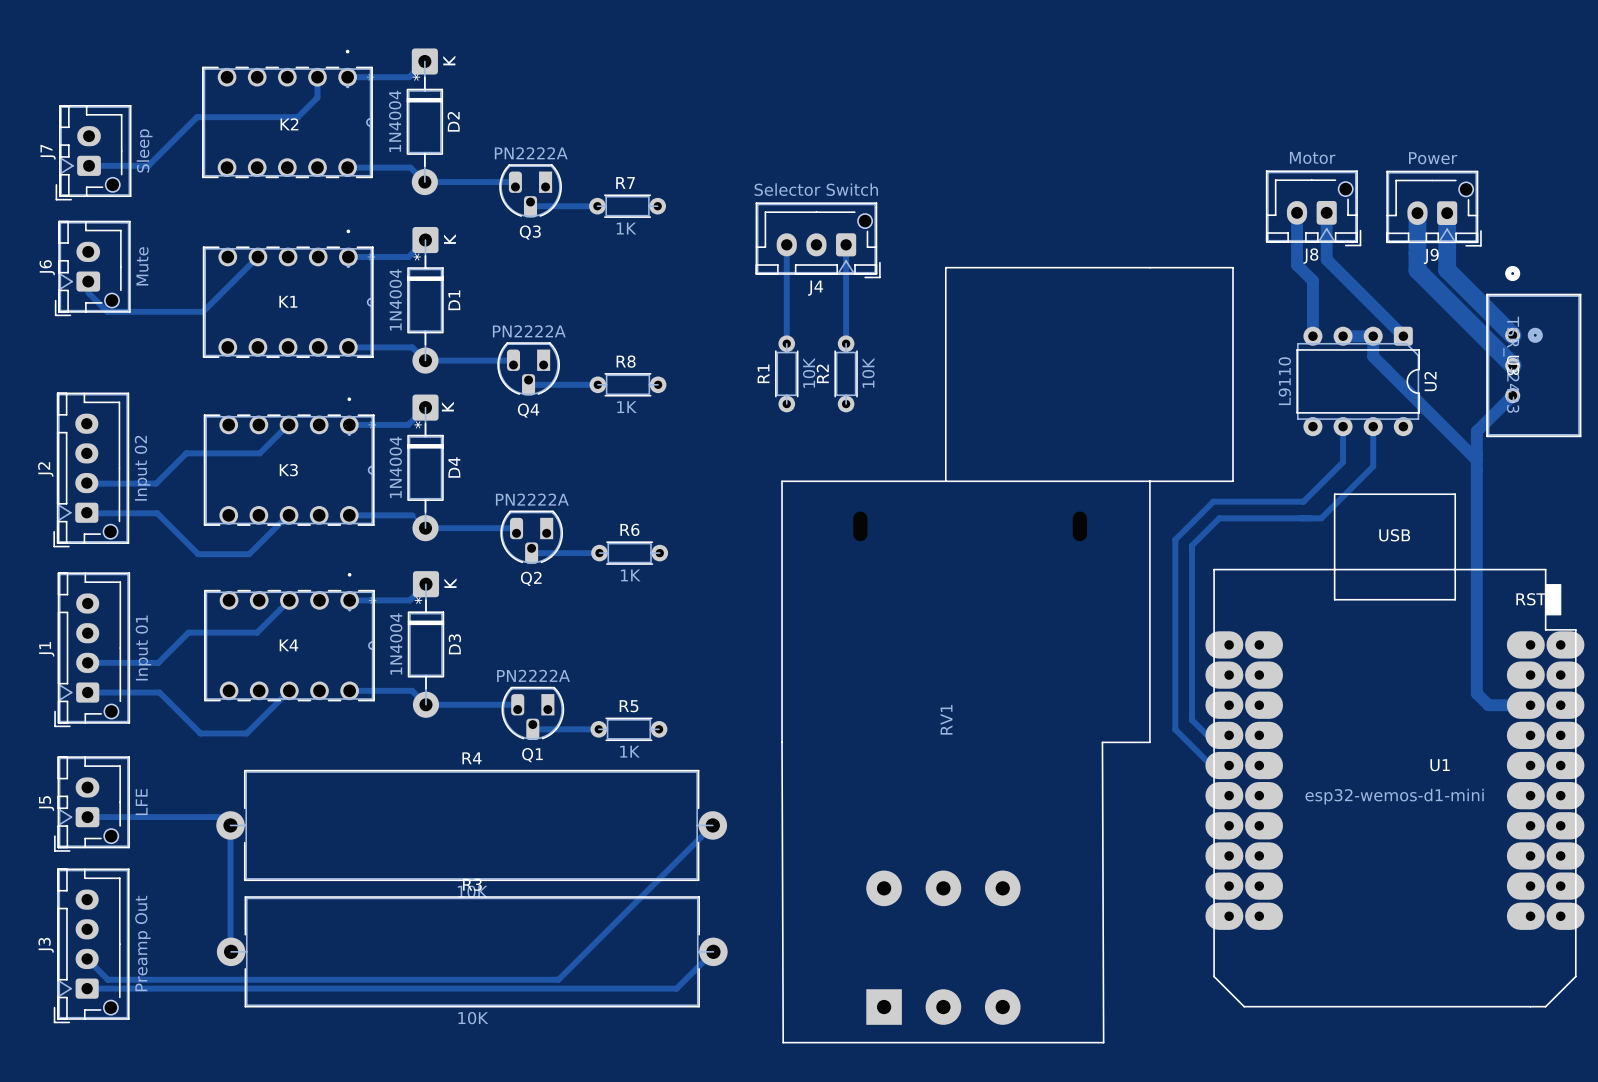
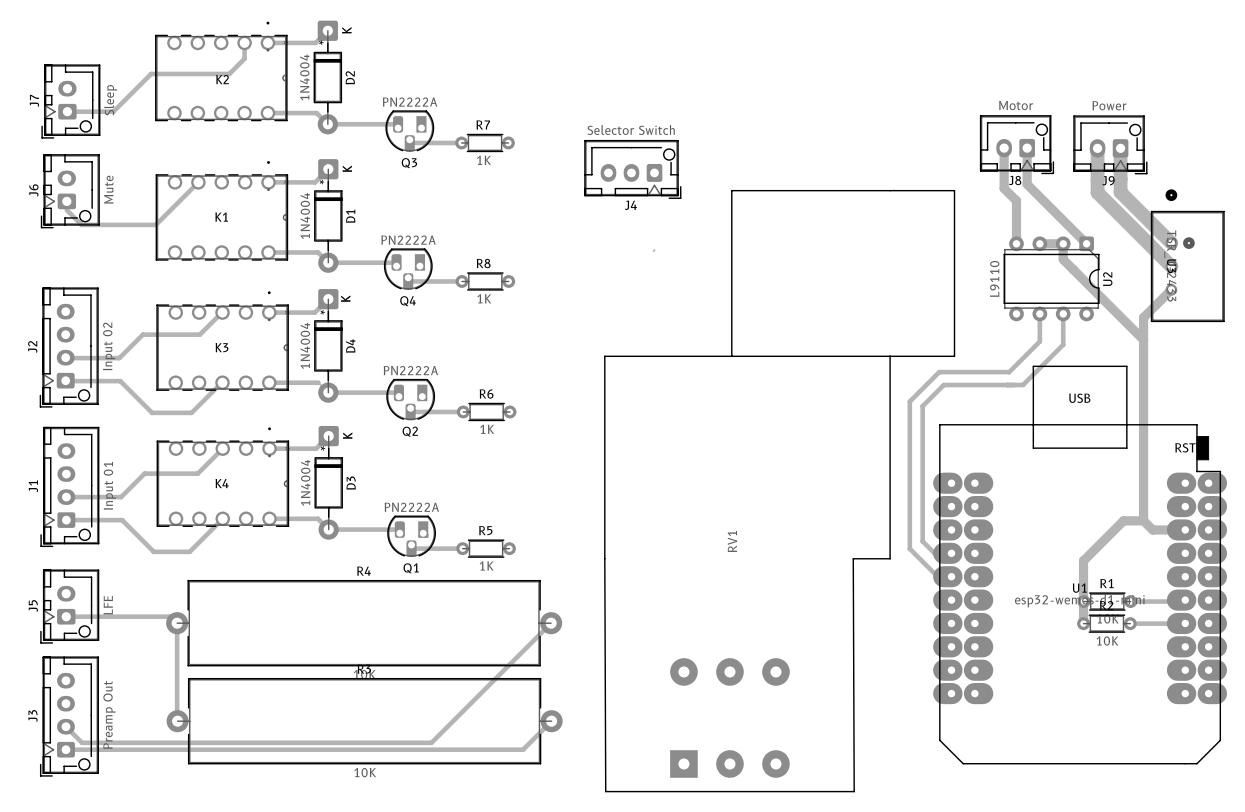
track: (786, 244) (786, 343) -> none
track: (846, 244) (846, 343) -> none
R1 rotation: 0° (786, 373) -> 90° clockwise (1107, 601)
R1 position: (786, 373) -> (1107, 601)
R2 rotation: 0° (846, 373) -> 90° clockwise (1106, 623)
R2 position: (846, 373) -> (1106, 623)
track: none -> (1143, 520) (1123, 520) (1083, 560) (1083, 623) (1083, 601)
U1 name position: U1 (1440, 765) -> U1 (1079, 588)
track: none -> (1185, 600) (1130, 601)
track: none -> (1185, 623) (1130, 623)

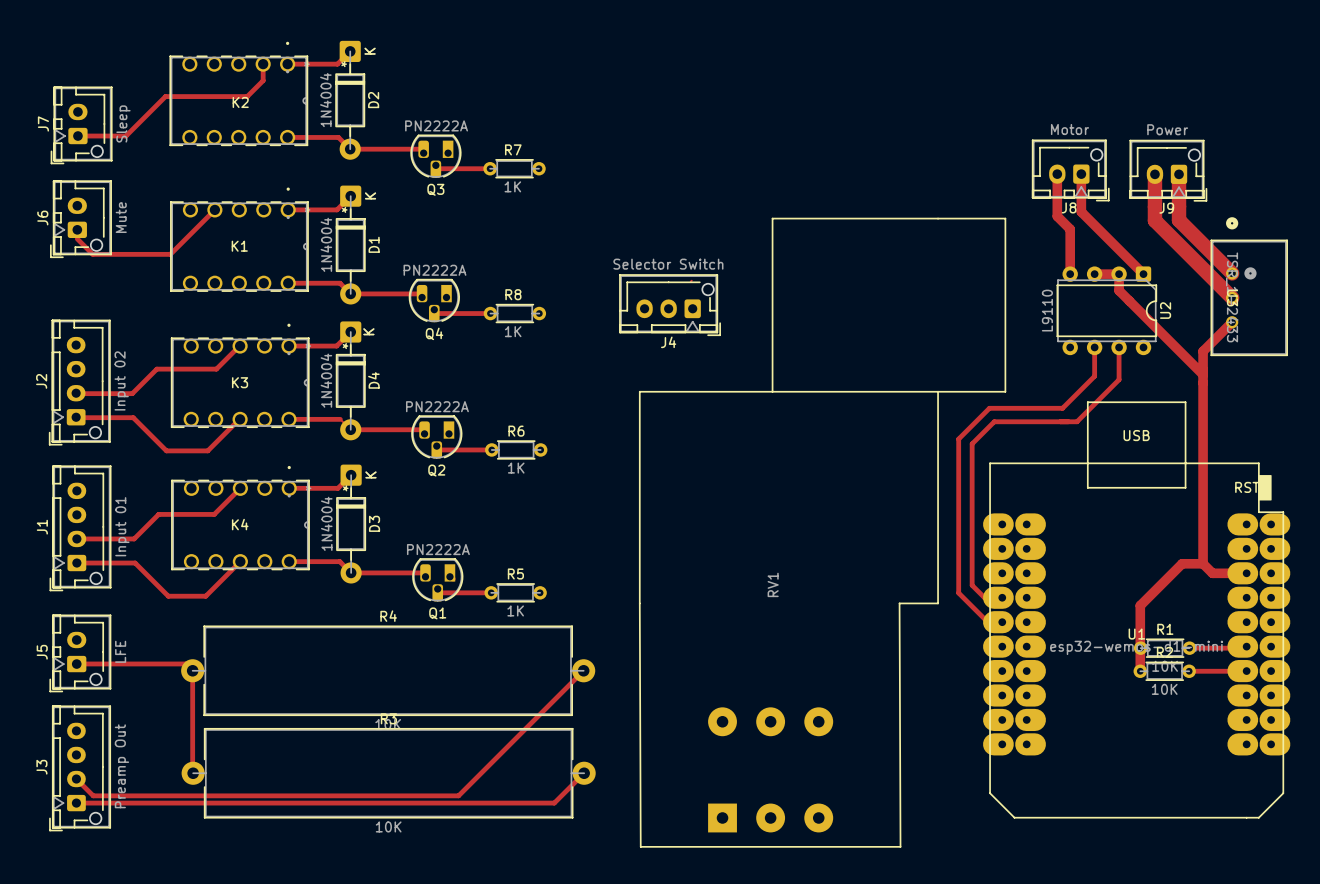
J4 position: (632, 169) -> (670, 305)

